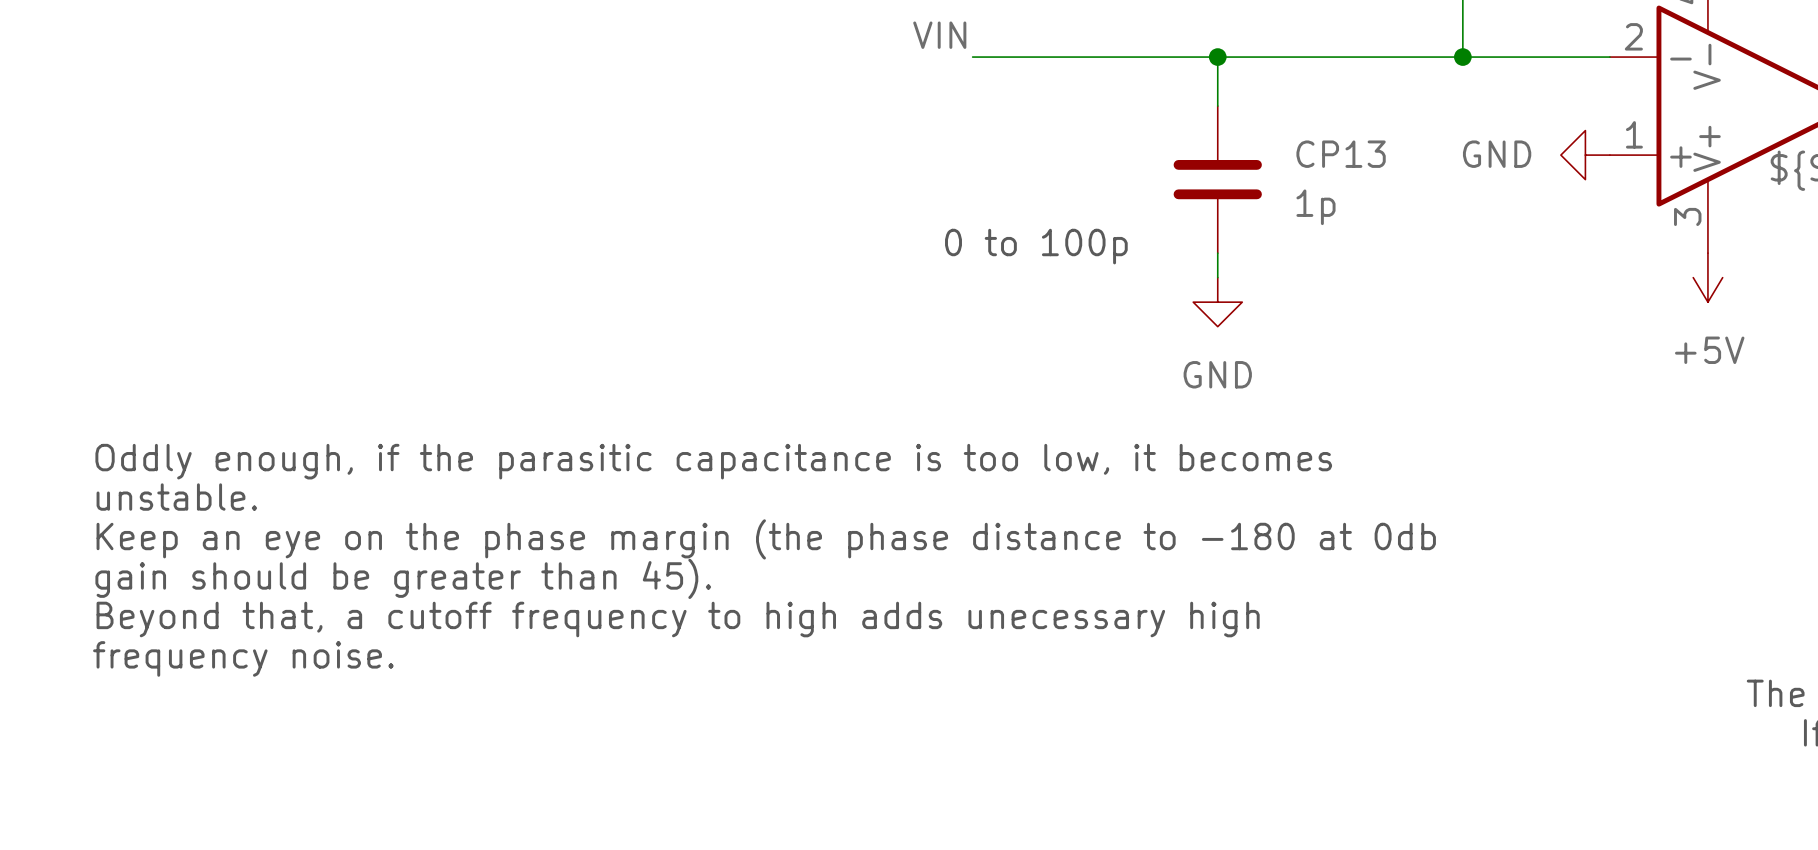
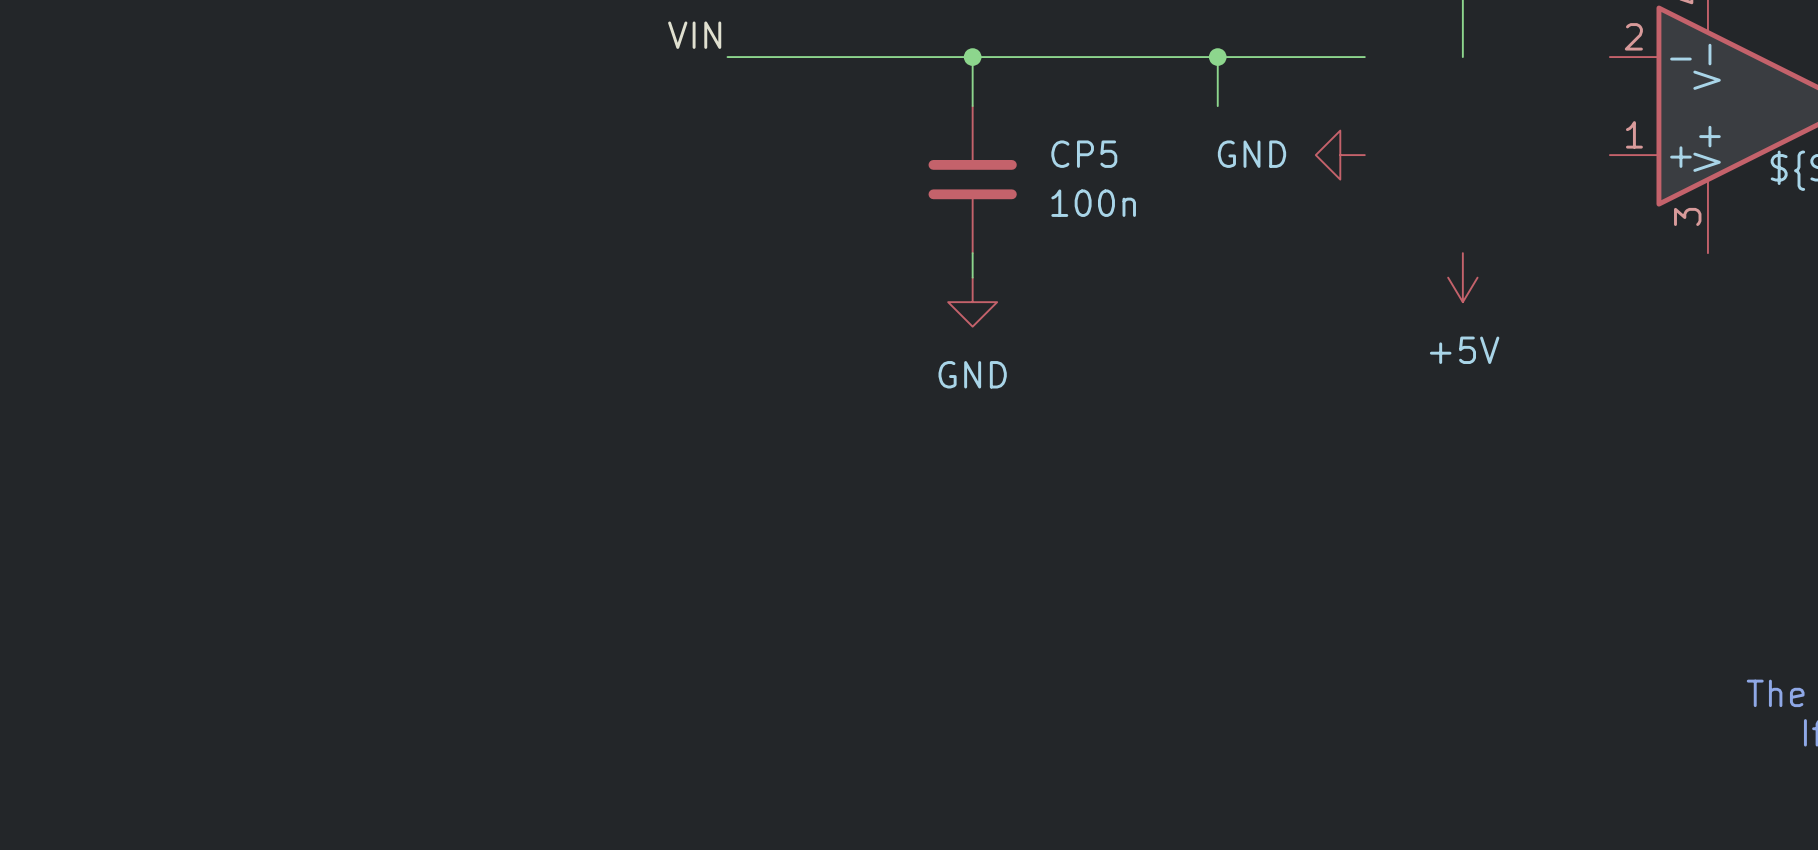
label position: VIN (939, 35) -> VIN (694, 35)
wire: none -> (727, 57) (972, 57) (972, 106)
junction: none -> (972, 57)
wire: (1364, 57) (1609, 57) -> none
junction: (1462, 57) -> none
power symbol: none -> GND (1340, 155)
power symbol: GND (1585, 155) -> none
CP5: none -> 100n (972, 179)
CP13: 1p (1217, 179) -> none
text: 0 to 100p (1036, 246) -> none
wire: (1217, 253) (1217, 277) -> (972, 253) (972, 277)
power symbol position: +5V (1707, 277) -> +5V (1462, 277)
power symbol: none -> GND (972, 302)
power symbol: GND (1217, 302) -> none
text: Oddly enough, if the parasitic capacitance is too low, it becomes (713, 461) -> none
text: unstable. (176, 497) -> none
text: Keep an eye on the phase margin (the phase distance to -180 at 0db (766, 539) -> none
text: gain should be greater than 45). (403, 578) -> none
text: Beyond that, a cutoff frequency to high adds unecessary high (678, 619) -> none
text: frequency noise. (243, 658) -> none

